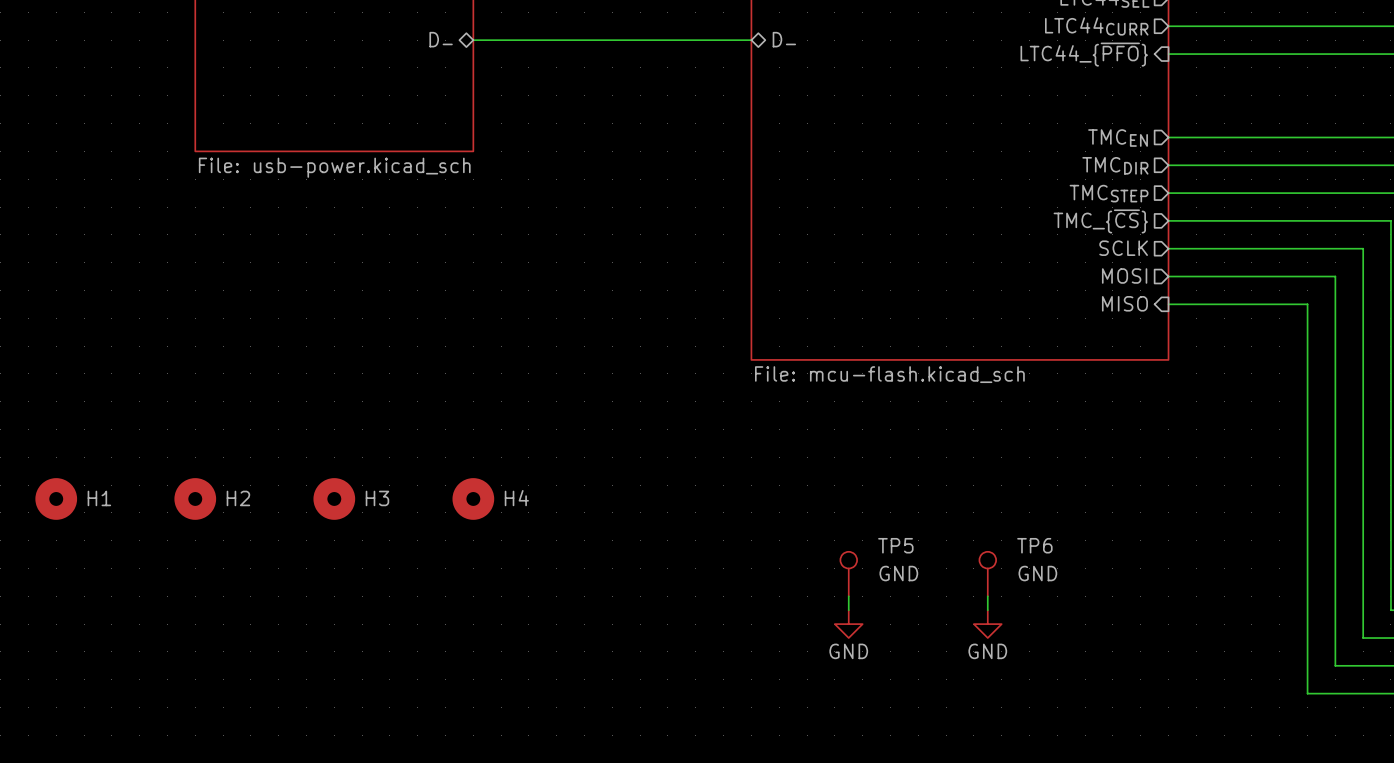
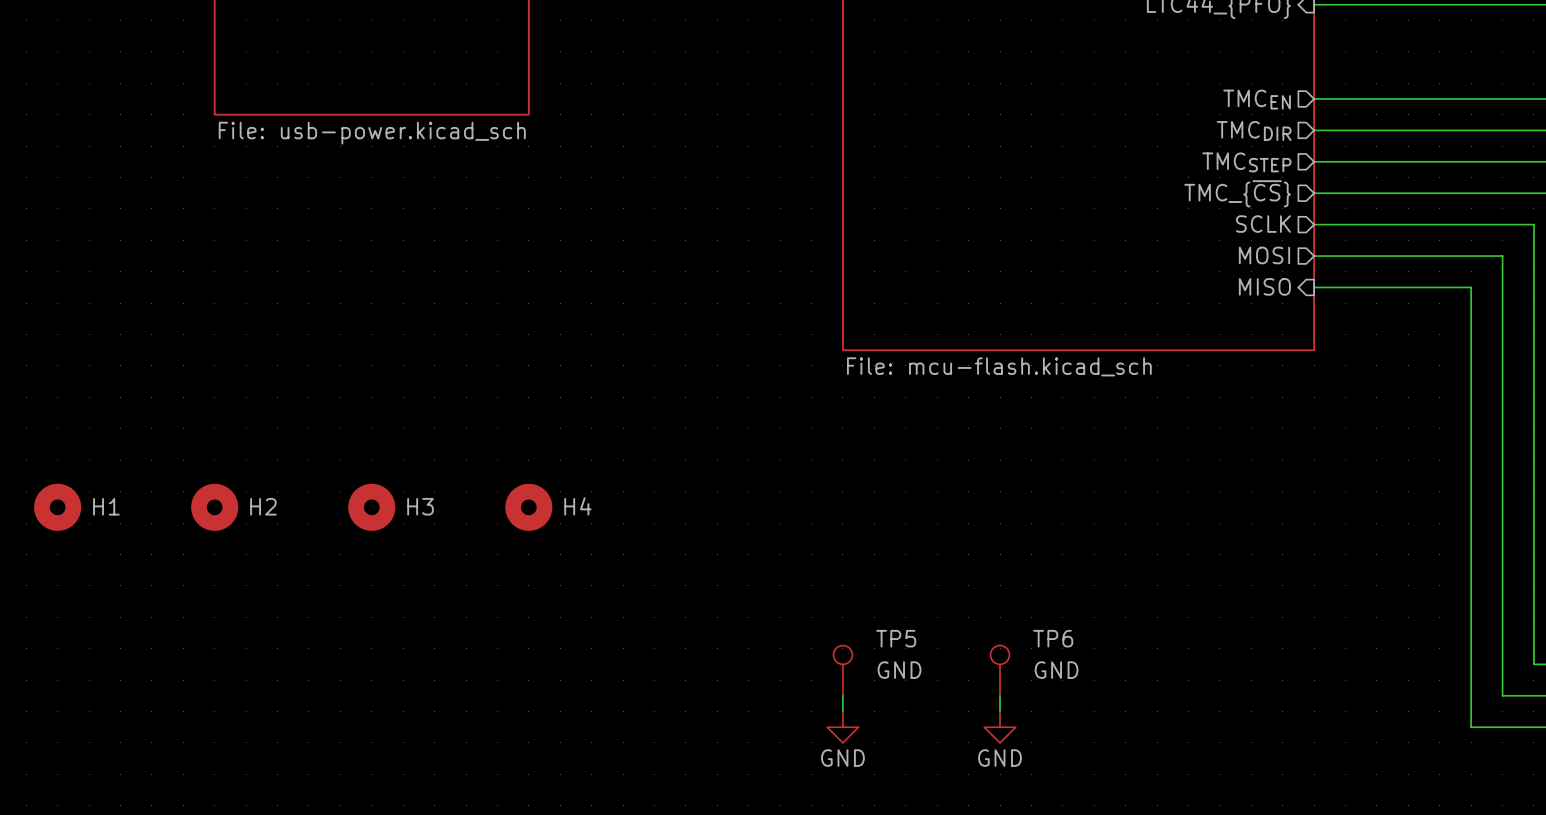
TP5 position: (848, 574) -> (842, 670)
TP6 position: (987, 574) -> (1000, 670)
wire: (848, 596) (848, 610) -> (1000, 695) (1000, 711)
wire: (987, 596) (987, 610) -> (842, 695) (842, 711)
power symbol: GND (848, 624) -> none
power symbol: GND (987, 624) -> none
power symbol: none -> GND (842, 727)
power symbol: none -> GND (1000, 727)

